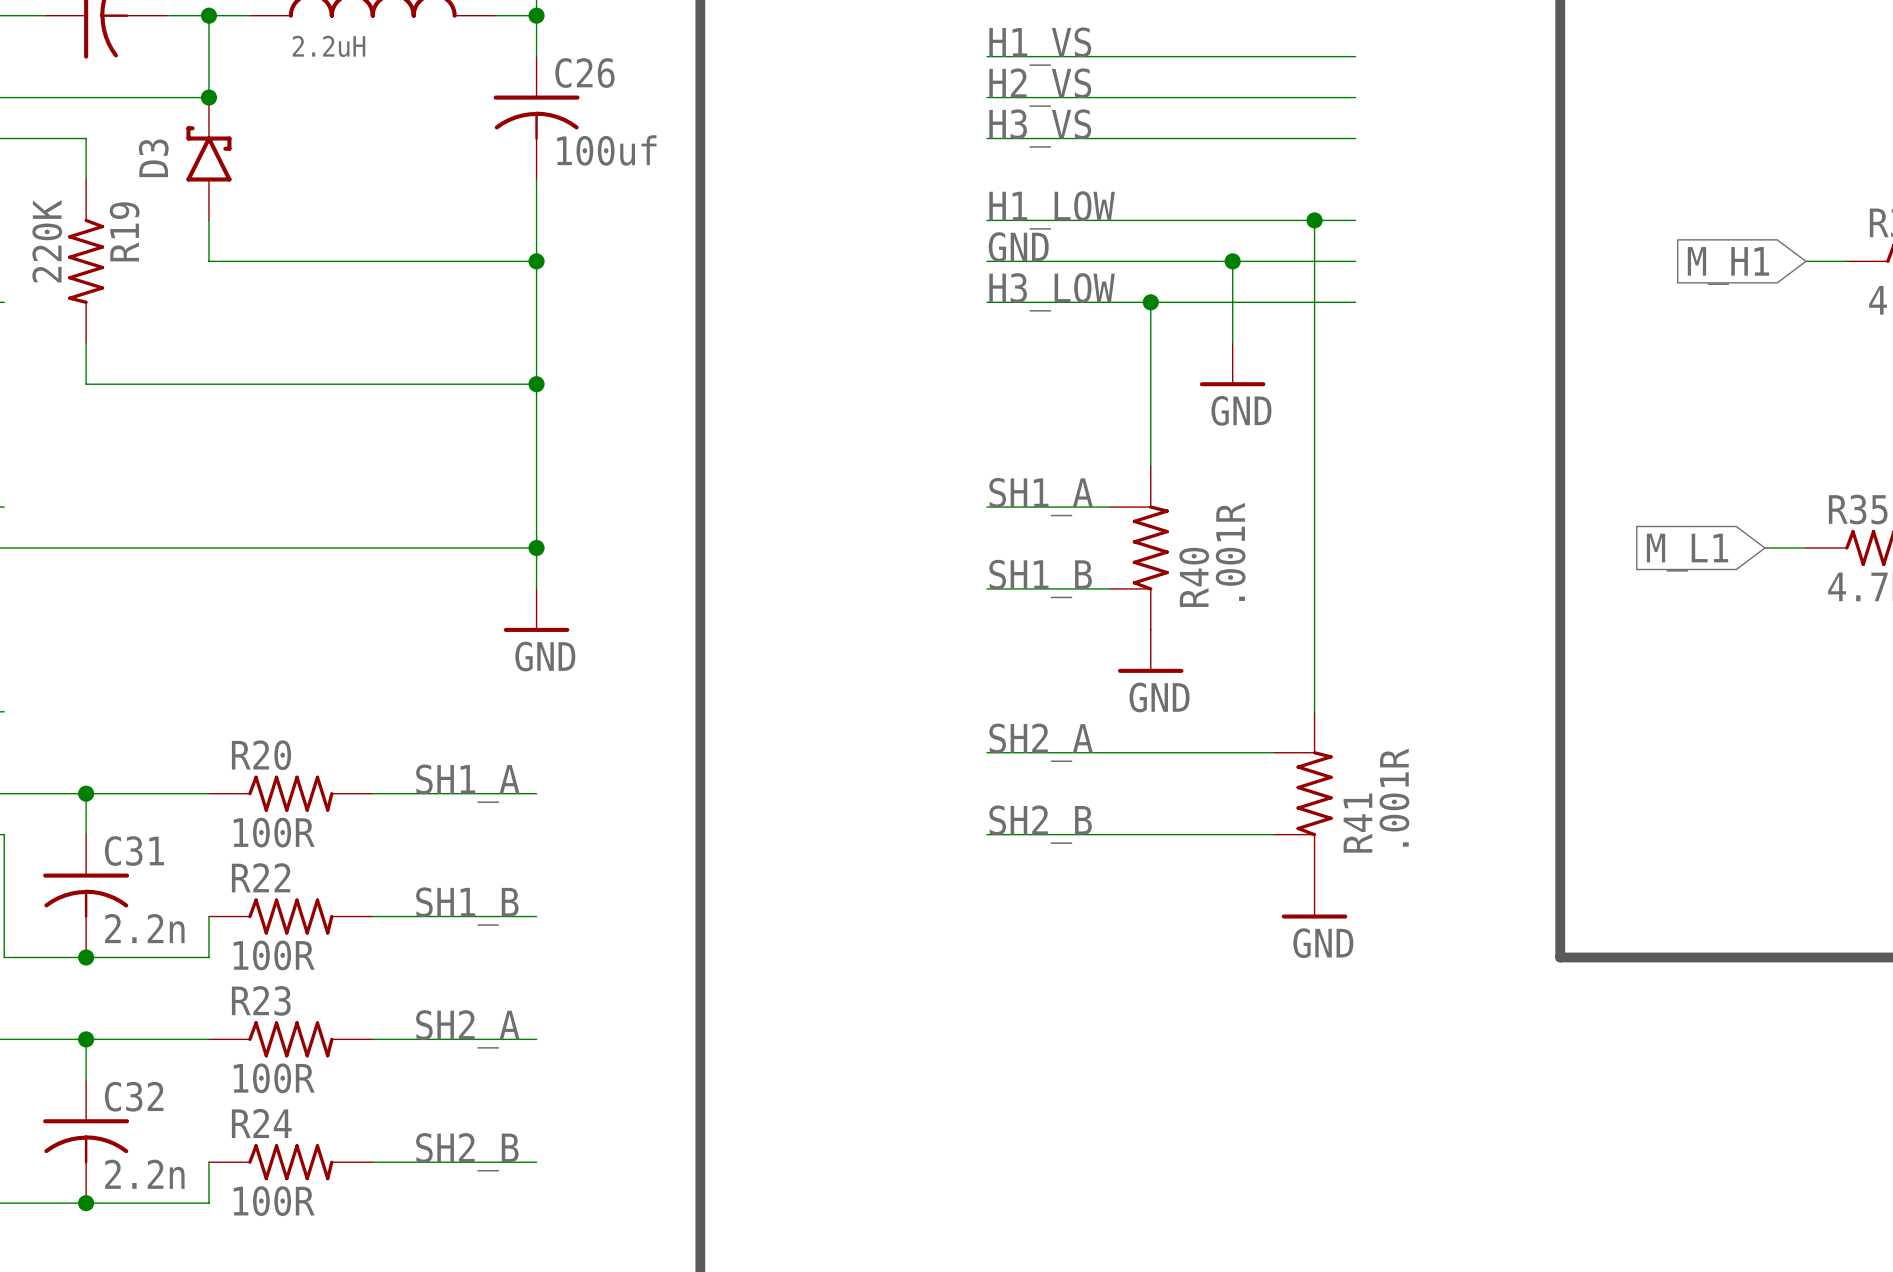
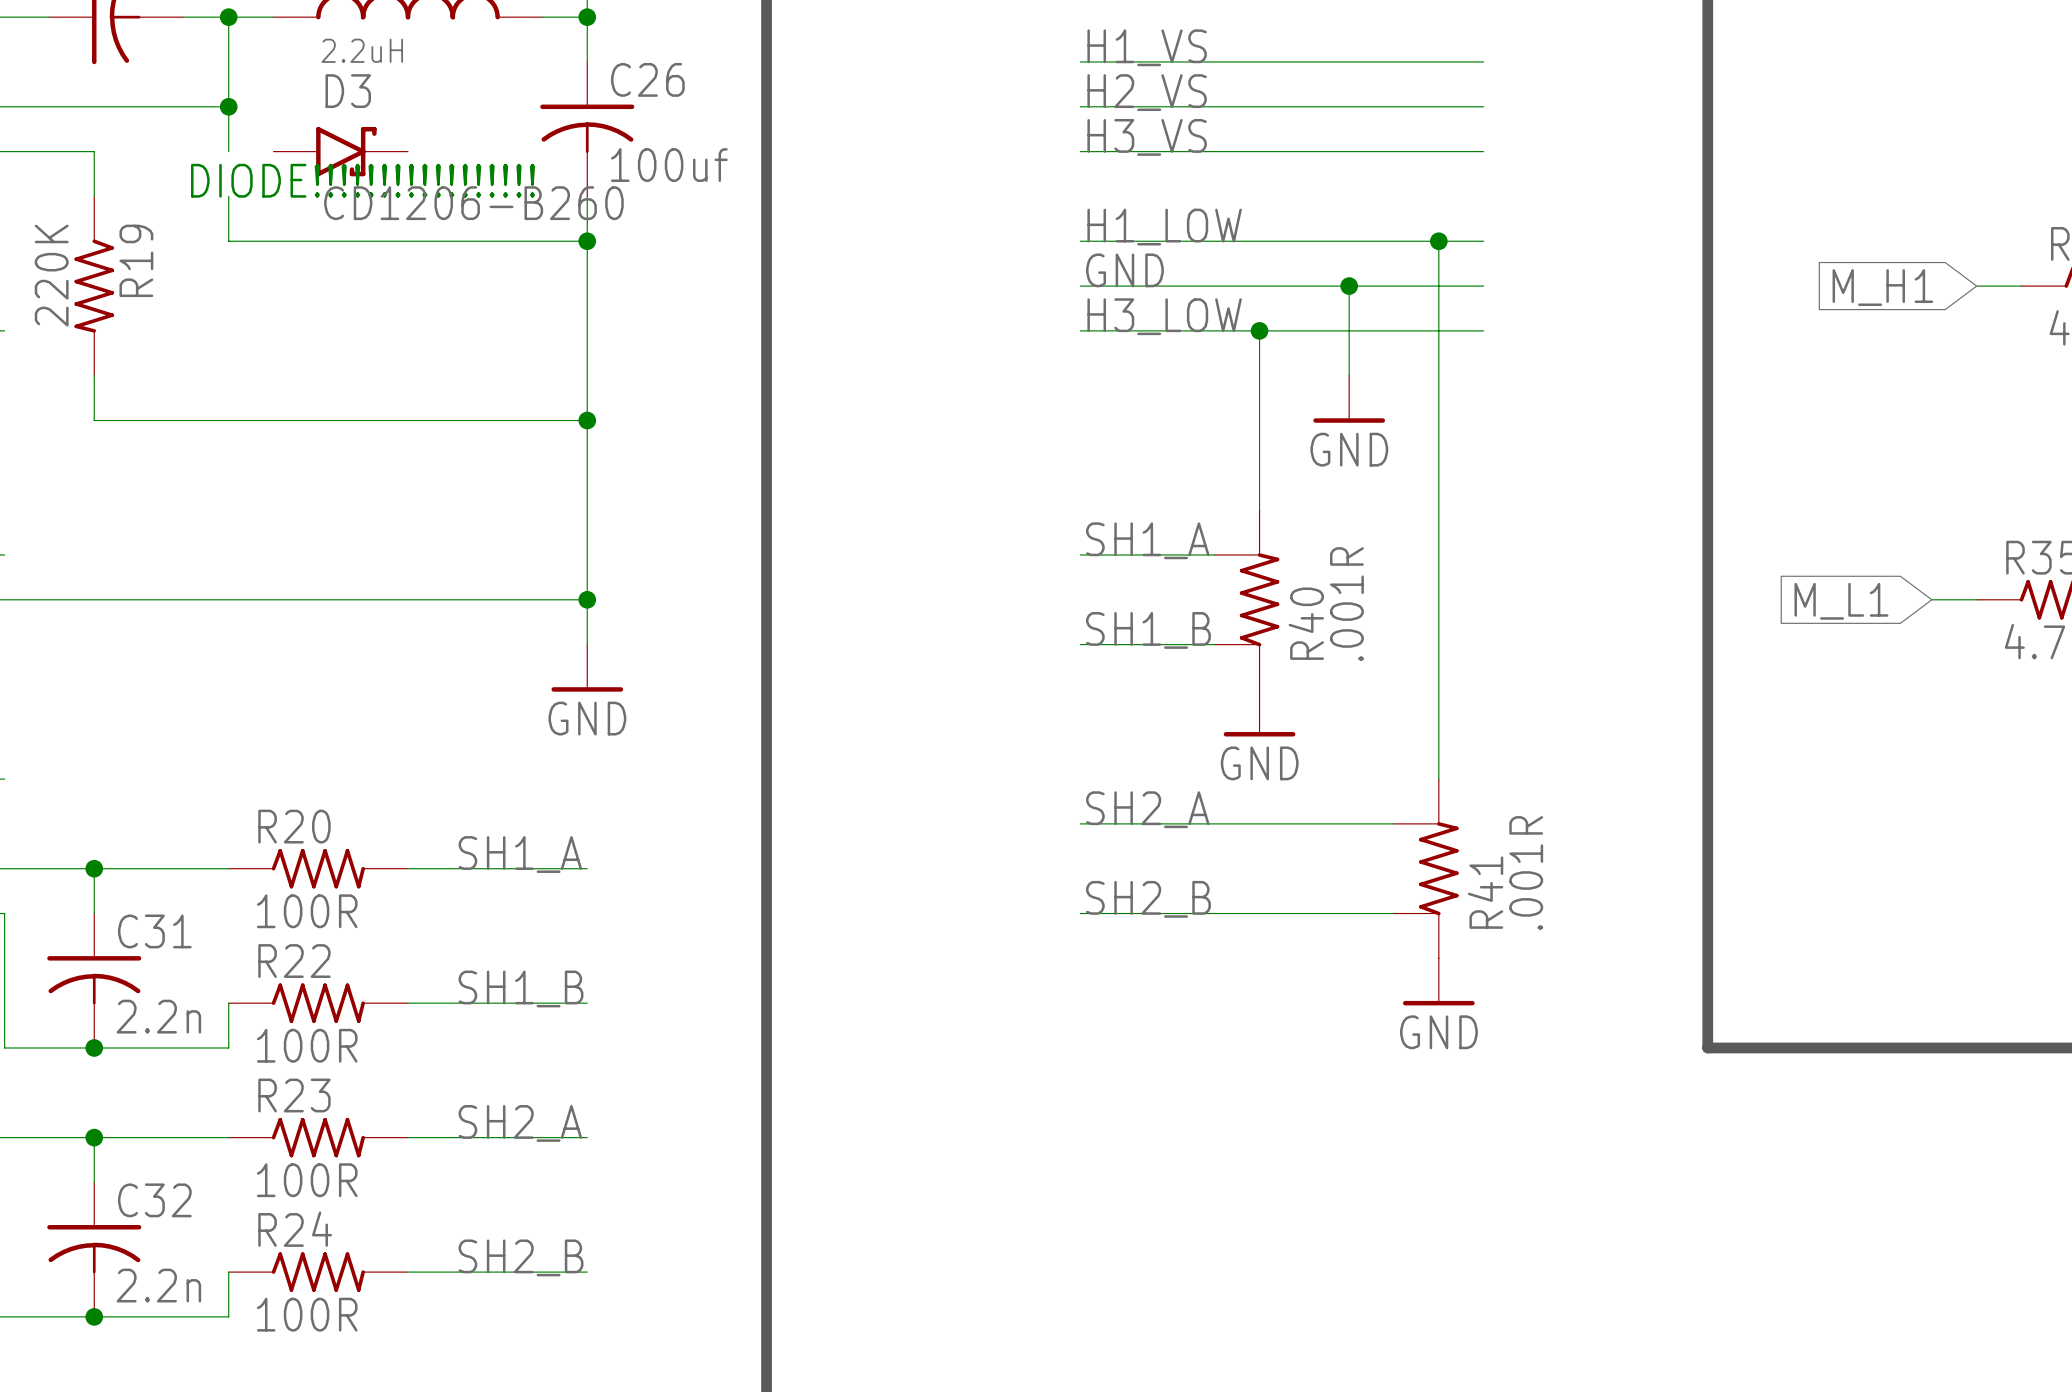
D3 rotation: 0° (208, 153) -> 90° clockwise (346, 151)
D3 position: (208, 158) -> (340, 151)
text: none -> DIODE!!!!!!!!!!!!!!!!! (363, 180)
D3 value: none -> CD1206-B260 (473, 203)
wire: (208, 220) (208, 261) (536, 261) -> (228, 196) (228, 241) (587, 241)
junction position: (536, 261) -> (587, 241)

